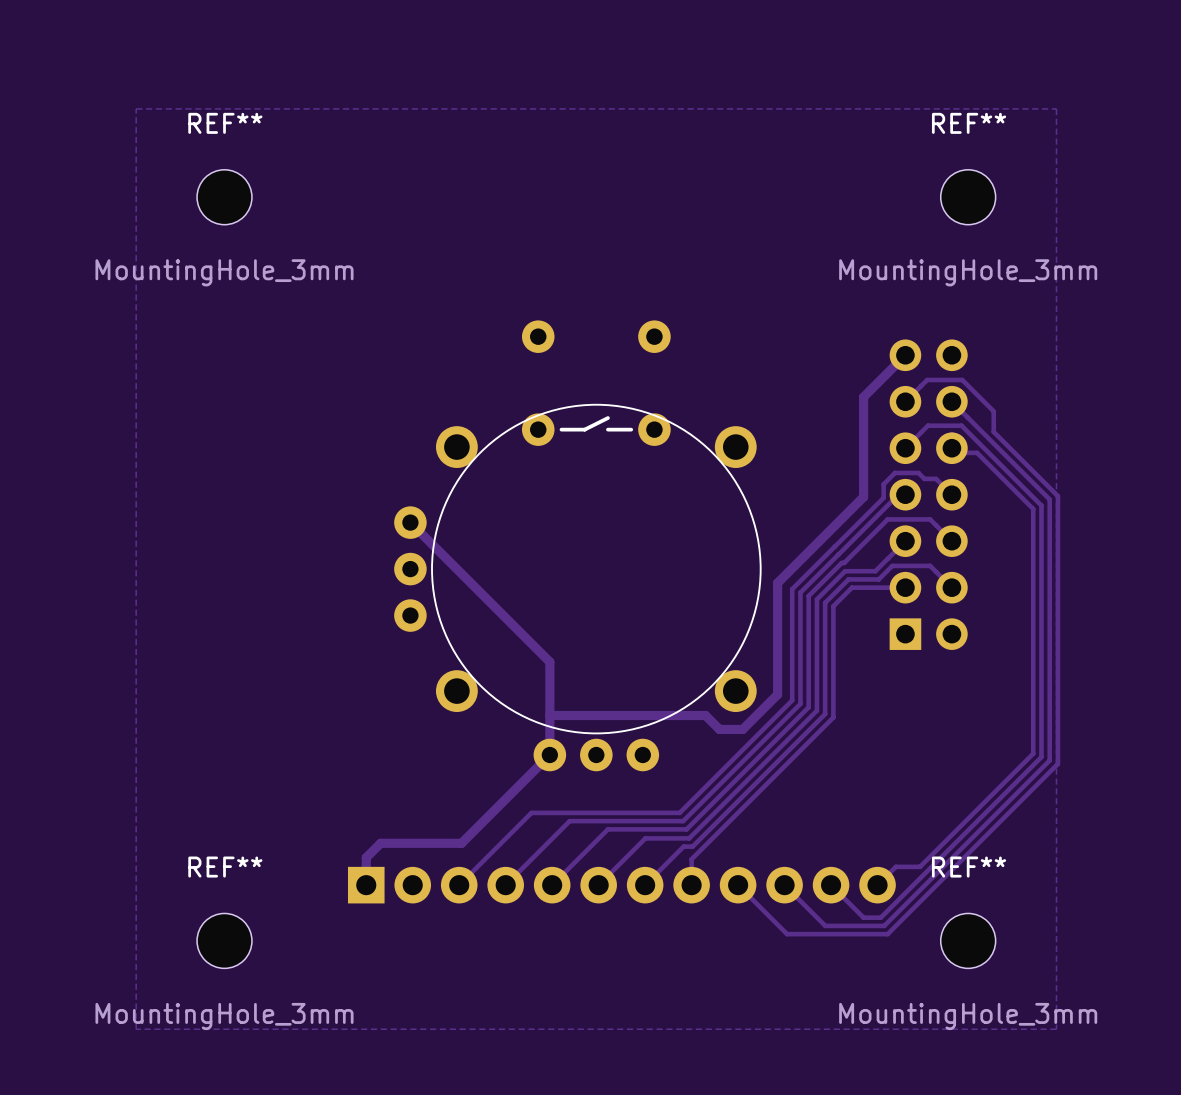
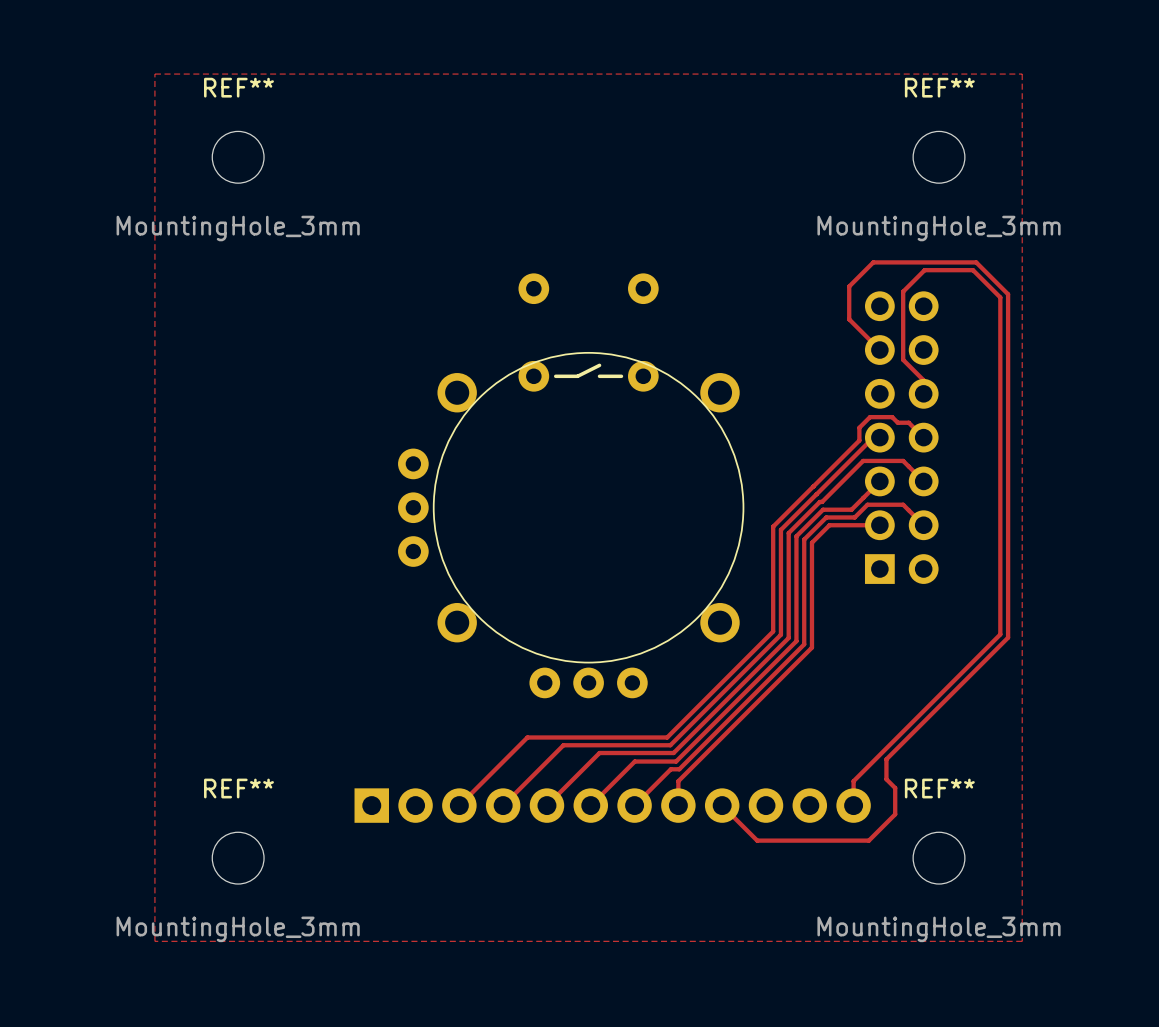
track: (905, 355) (863, 397) (863, 497) (777, 583) (777, 694) (742, 729) (719, 729) (705, 715) (549, 715) -> none
track: (905, 401) (927, 380) (962, 380) (993, 411) (993, 431) (1057, 496) (1057, 763) (887, 934) (787, 934) (775, 922) -> none
track: (951, 401) (1049, 499) (1049, 760) (884, 925) (825, 925) (784, 885) -> none
track: (905, 448) (927, 425) (961, 425) (1041, 505) -> (879, 350) (849, 319) (849, 286) (873, 262) (976, 262) (1008, 294) (1008, 447)
track: (951, 448) (956, 452) (977, 452) (1033, 509) -> (923, 380) (903, 359) (903, 291) (924, 270) (973, 270) (1000, 297) (1000, 451)
track: (410, 522) (549, 662) (549, 755) (461, 843) (380, 843) (366, 857) (366, 885) -> none
track: (1033, 703) (1033, 753) (920, 866) (895, 866) (877, 885) -> (1000, 634) (853, 781) (853, 805)
track: (1041, 706) (1041, 757) (880, 917) (863, 917) (831, 885) -> (1008, 637) (886, 759) (886, 779) (895, 788) (895, 814) (868, 840) (757, 840)

